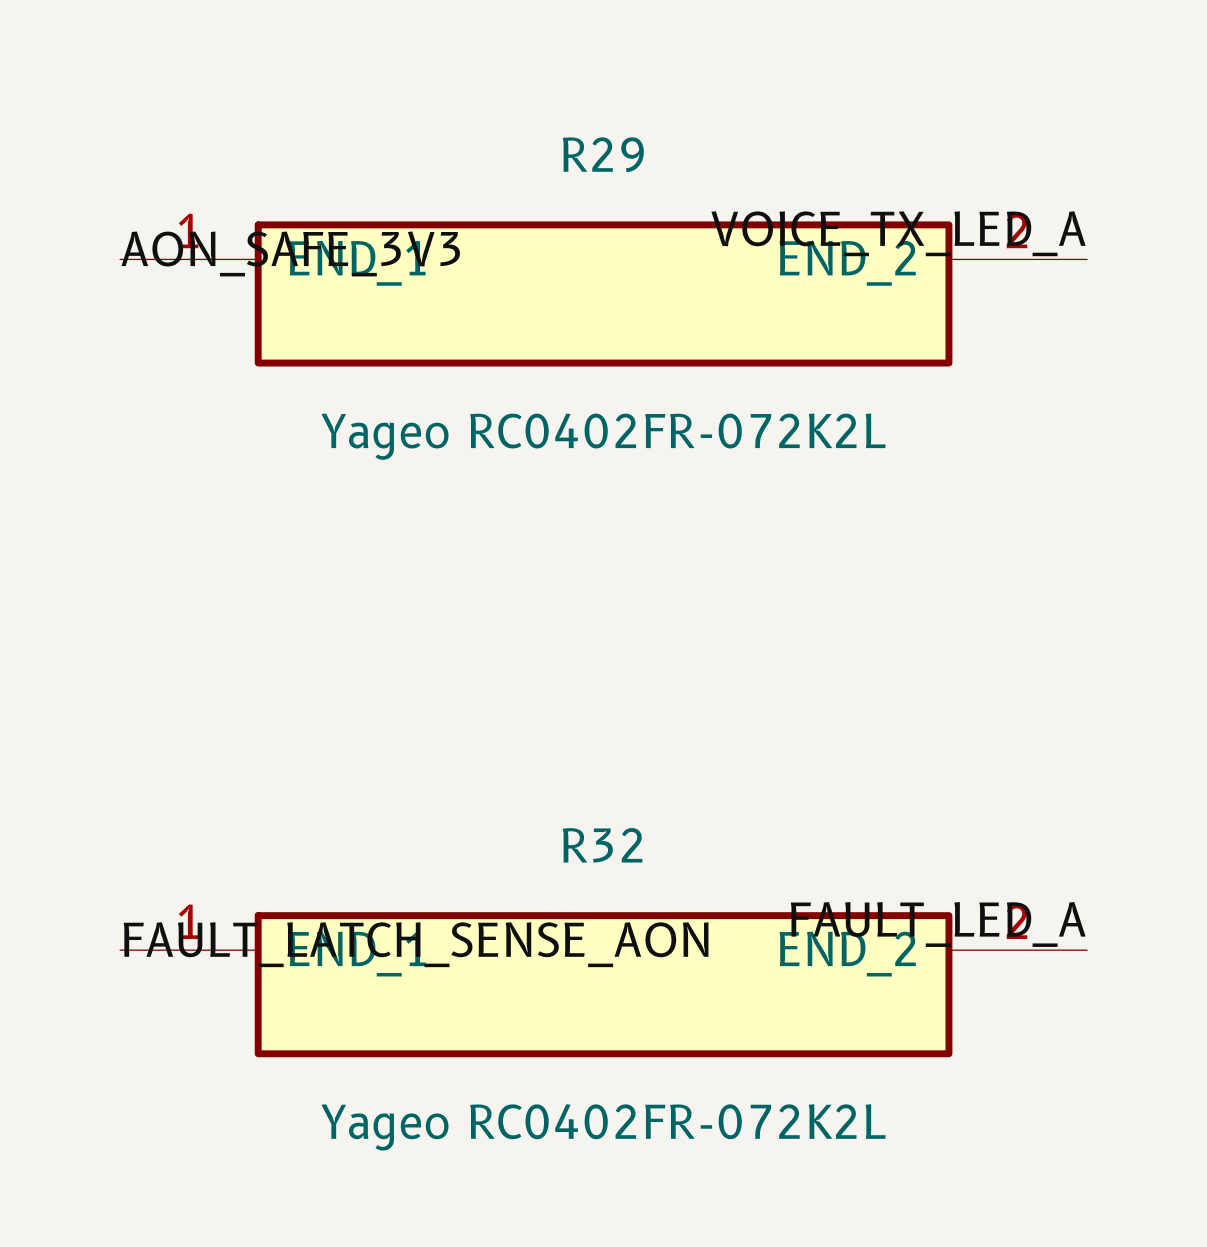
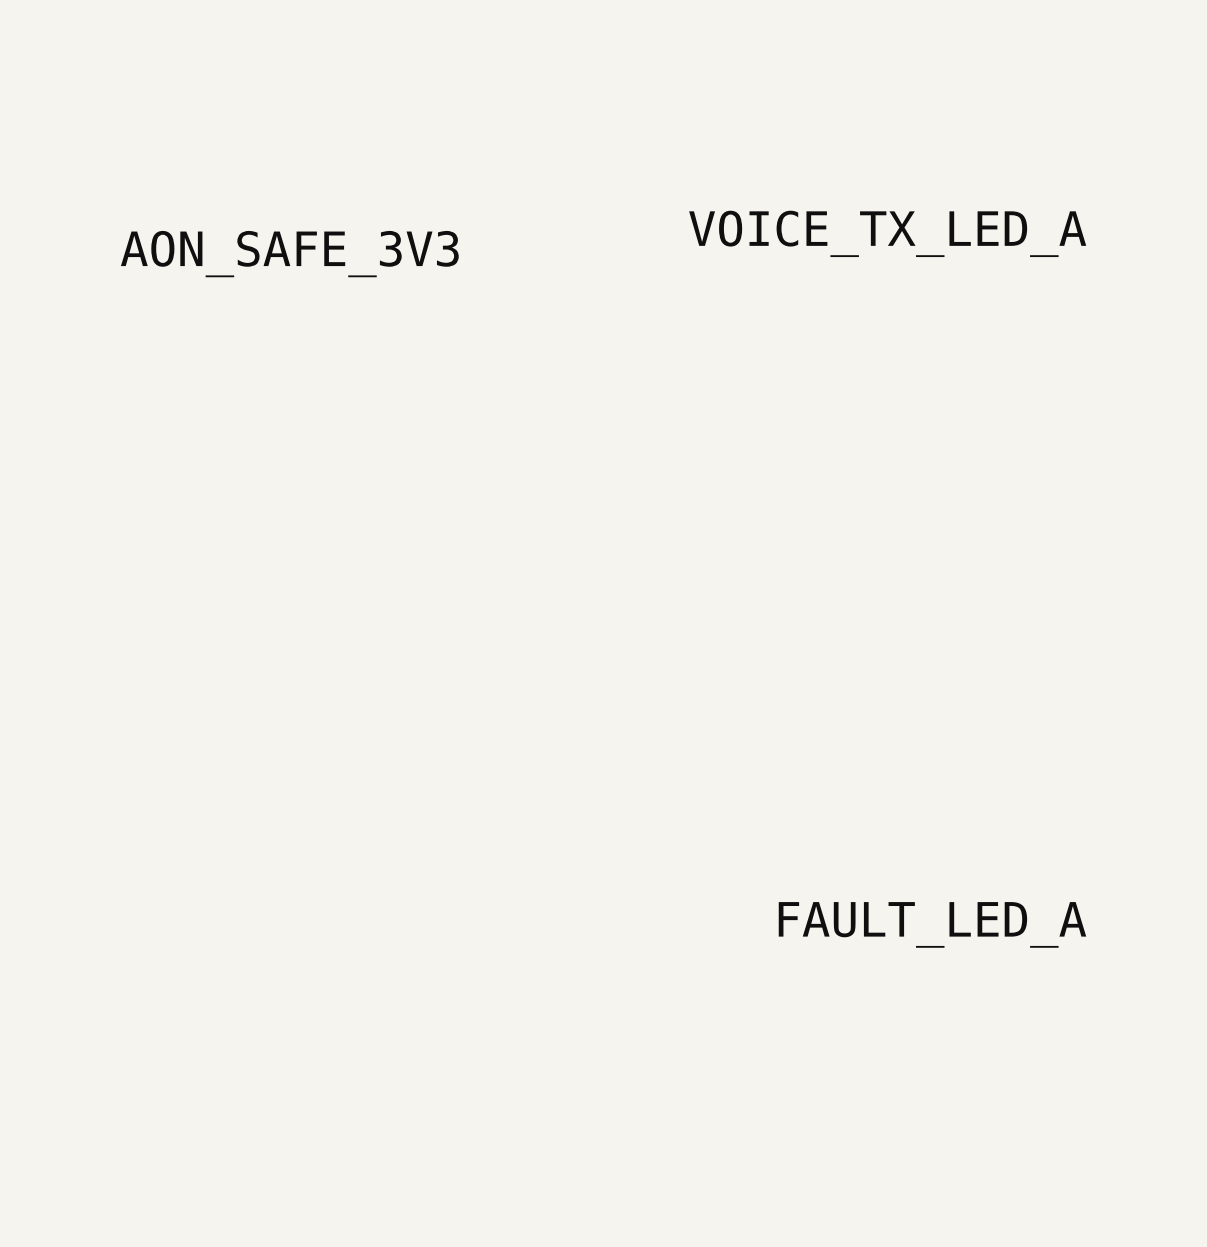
R29: Yageo RC0402FR-072K2L (603, 293) -> none
label: FAULT_LATCH_SENSE_AON (416, 944) -> none
R32: Yageo RC0402FR-072K2L (603, 984) -> none

